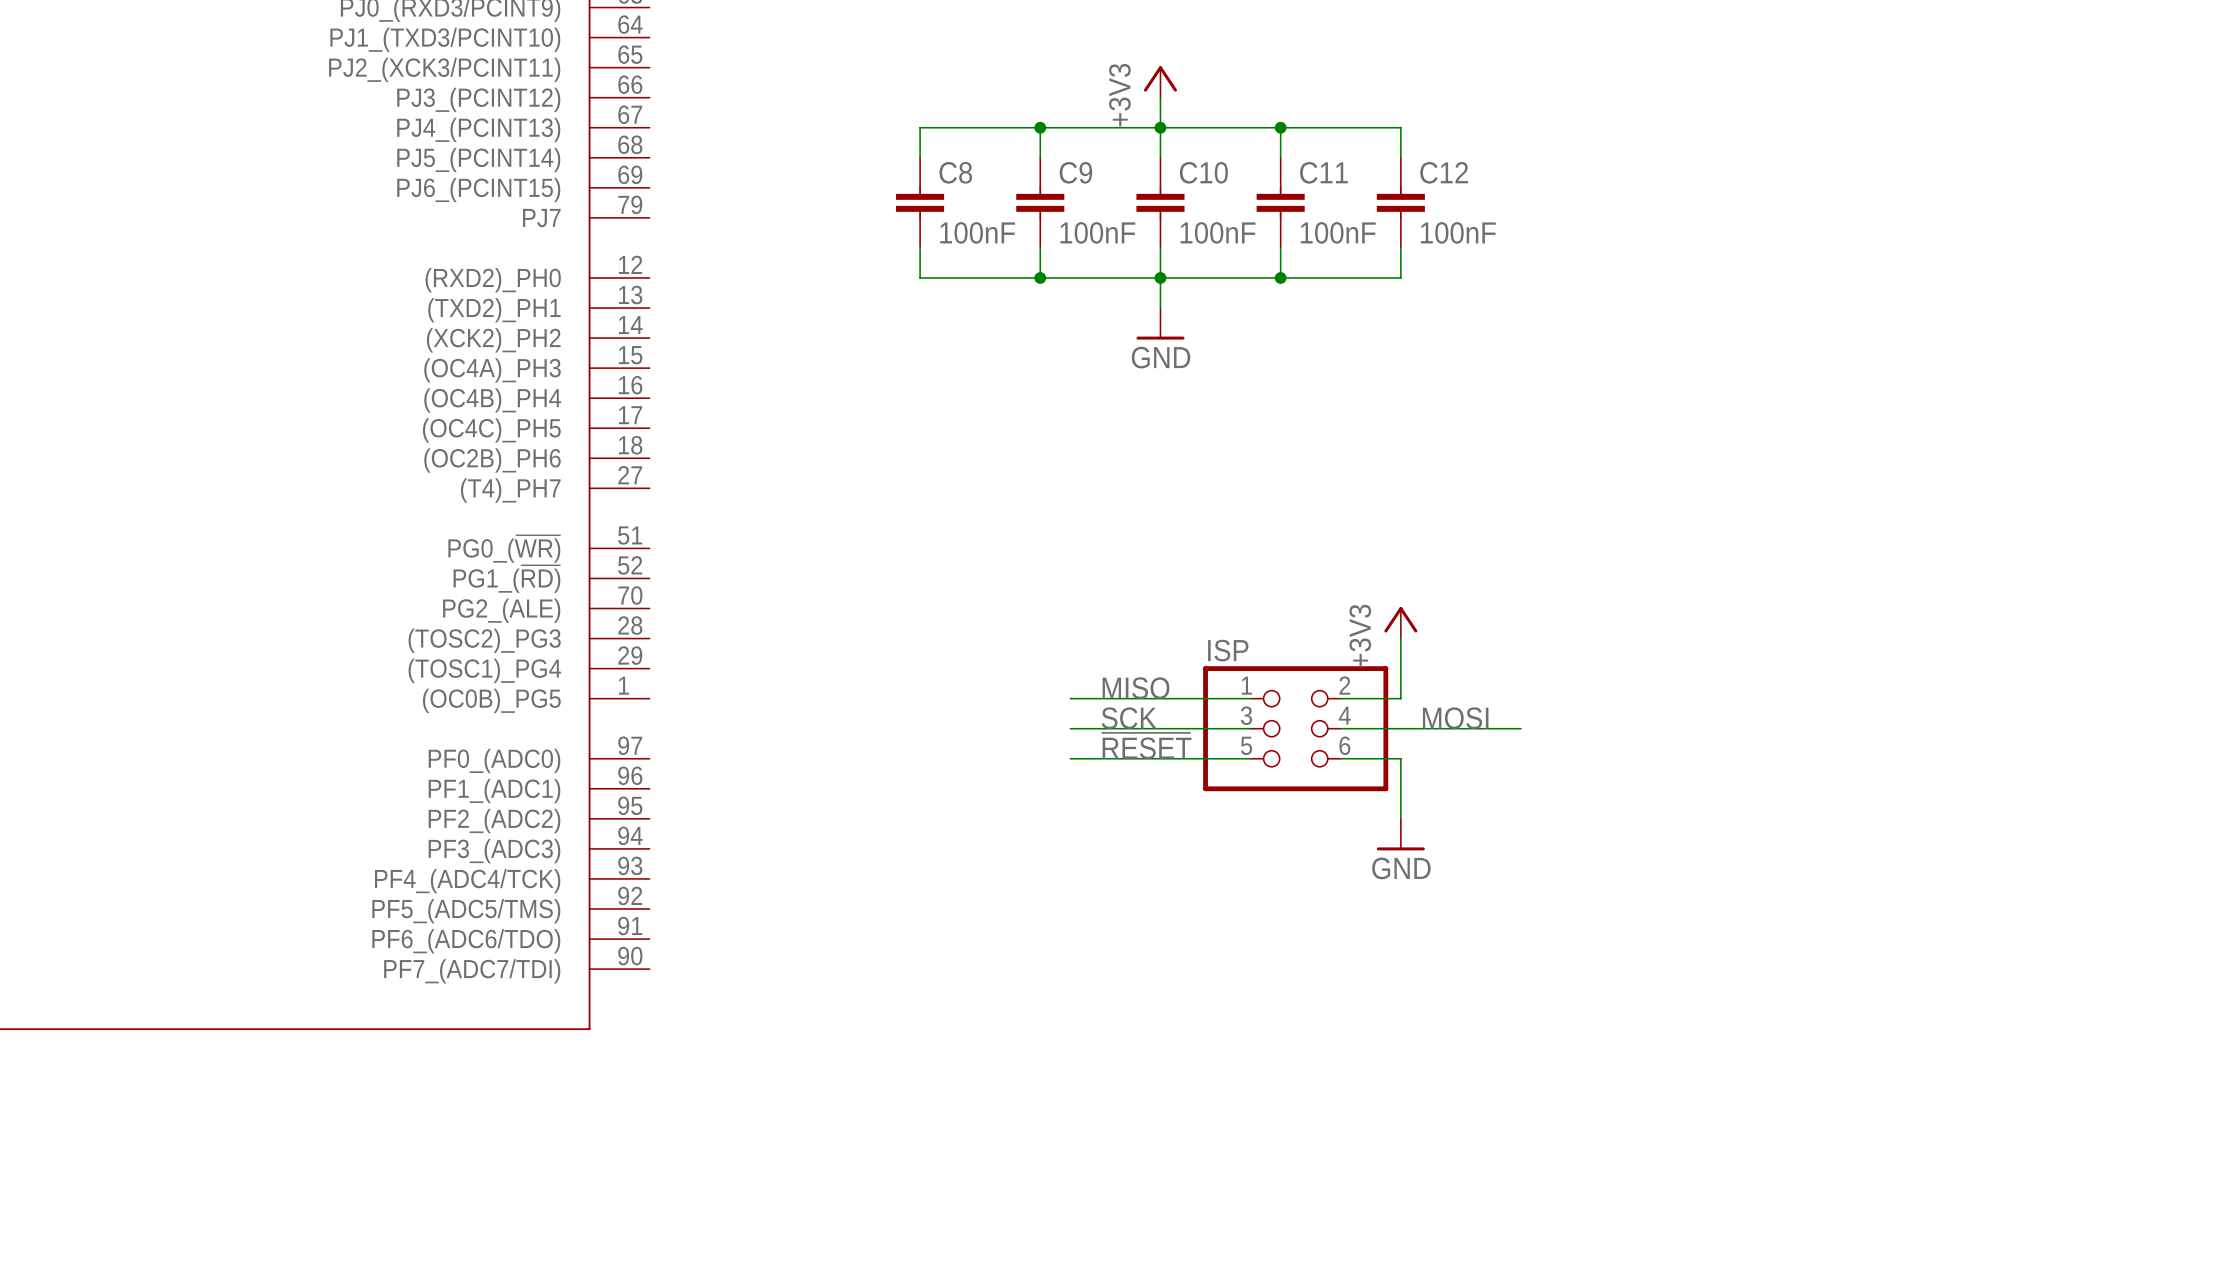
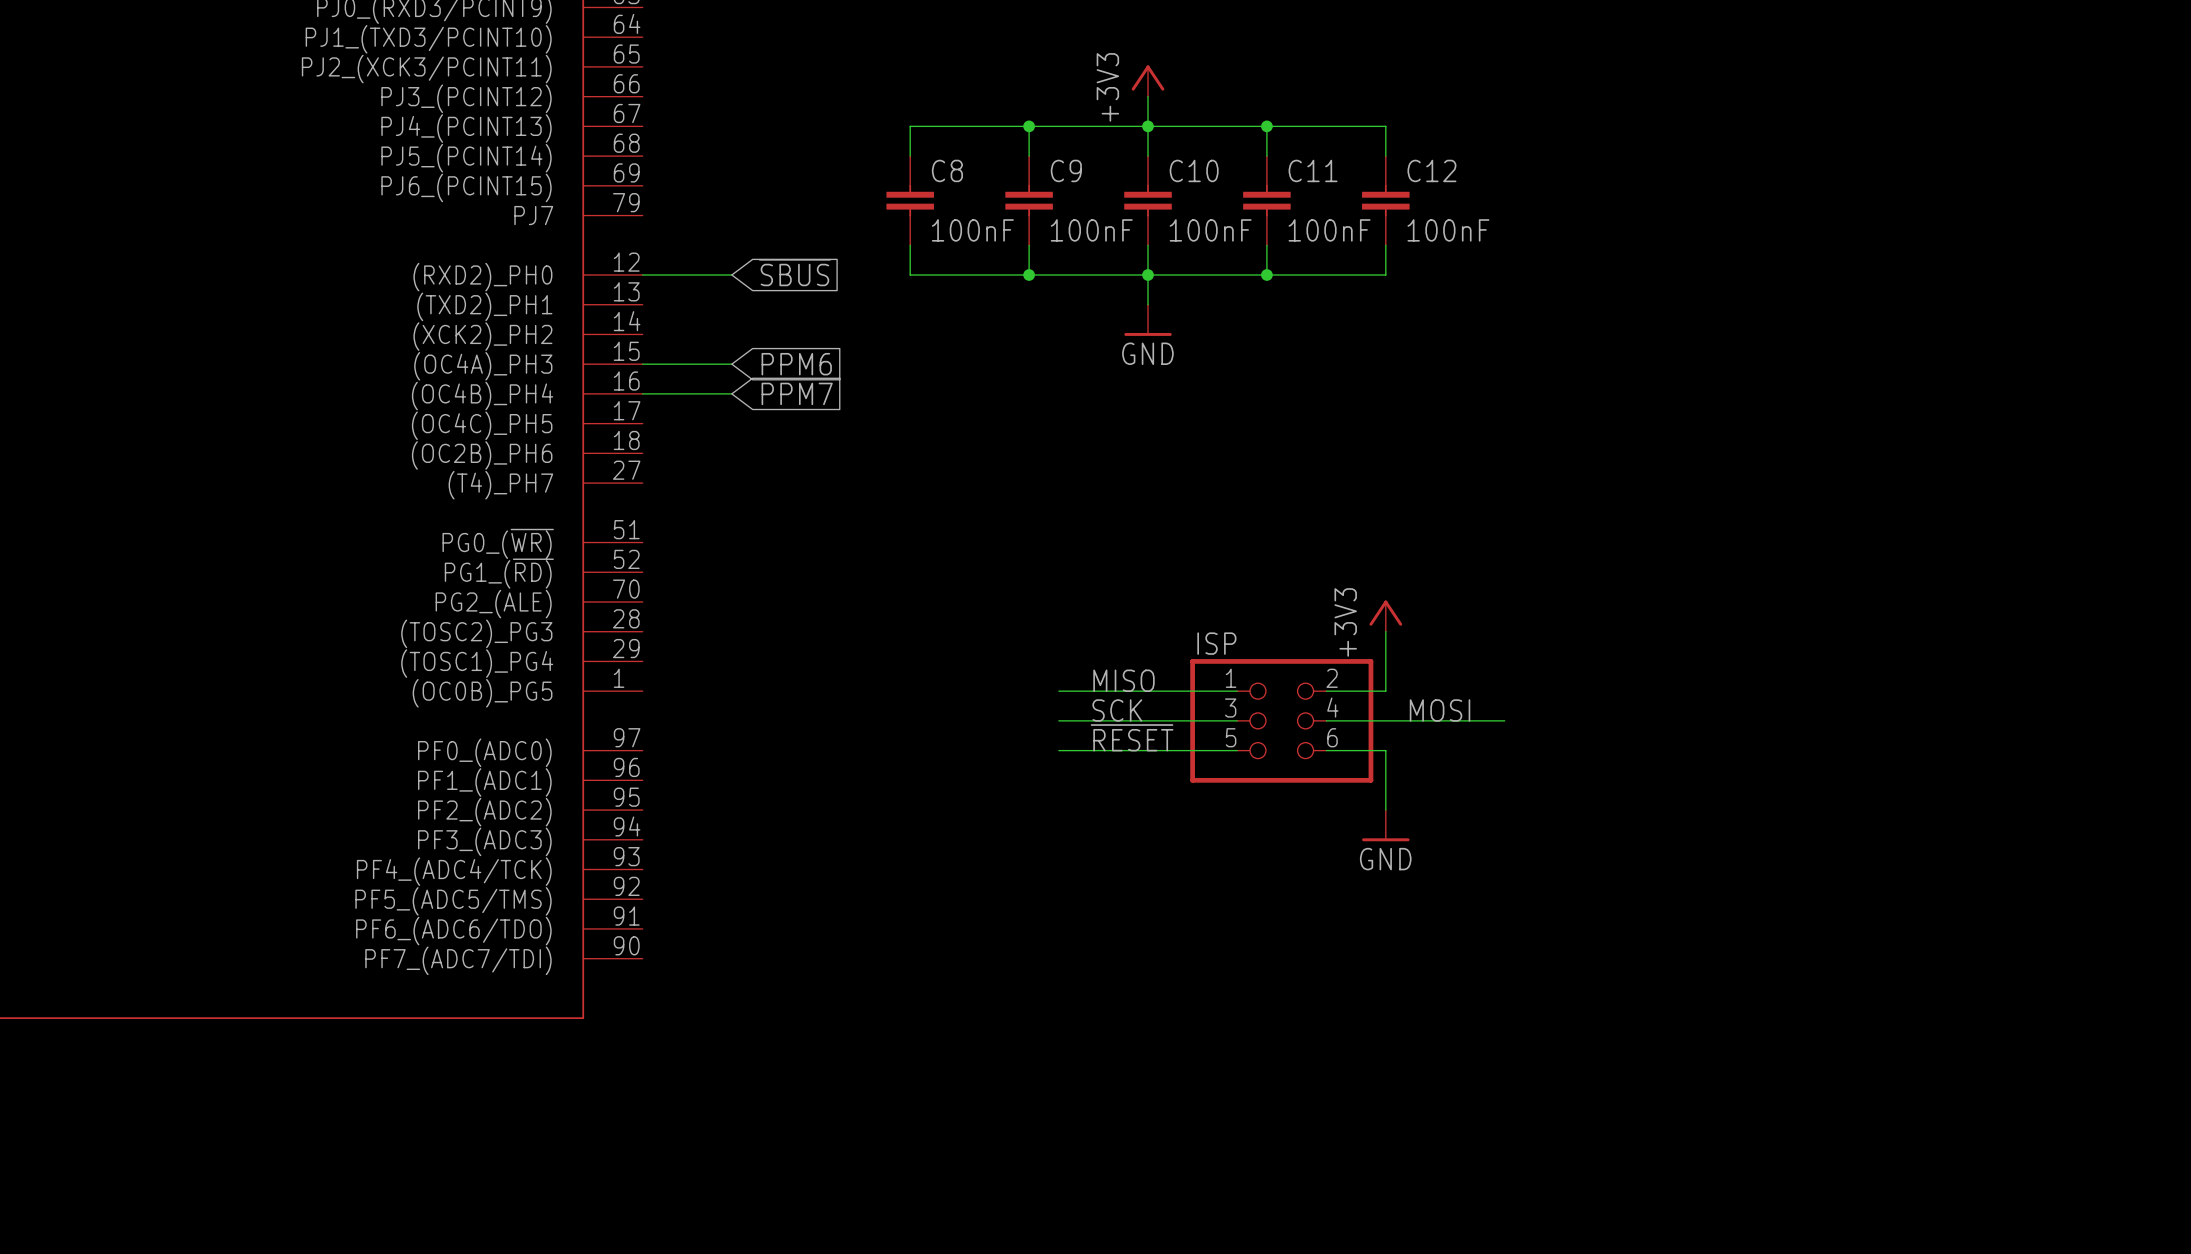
global label: none -> ~{SBUS} (794, 272)
wire: none -> (642, 275) (731, 275)
wire: none -> (642, 364) (731, 364)
global label: none -> PPM6 (796, 364)
wire: none -> (642, 393) (731, 393)
global label: none -> PPM7 (797, 393)

